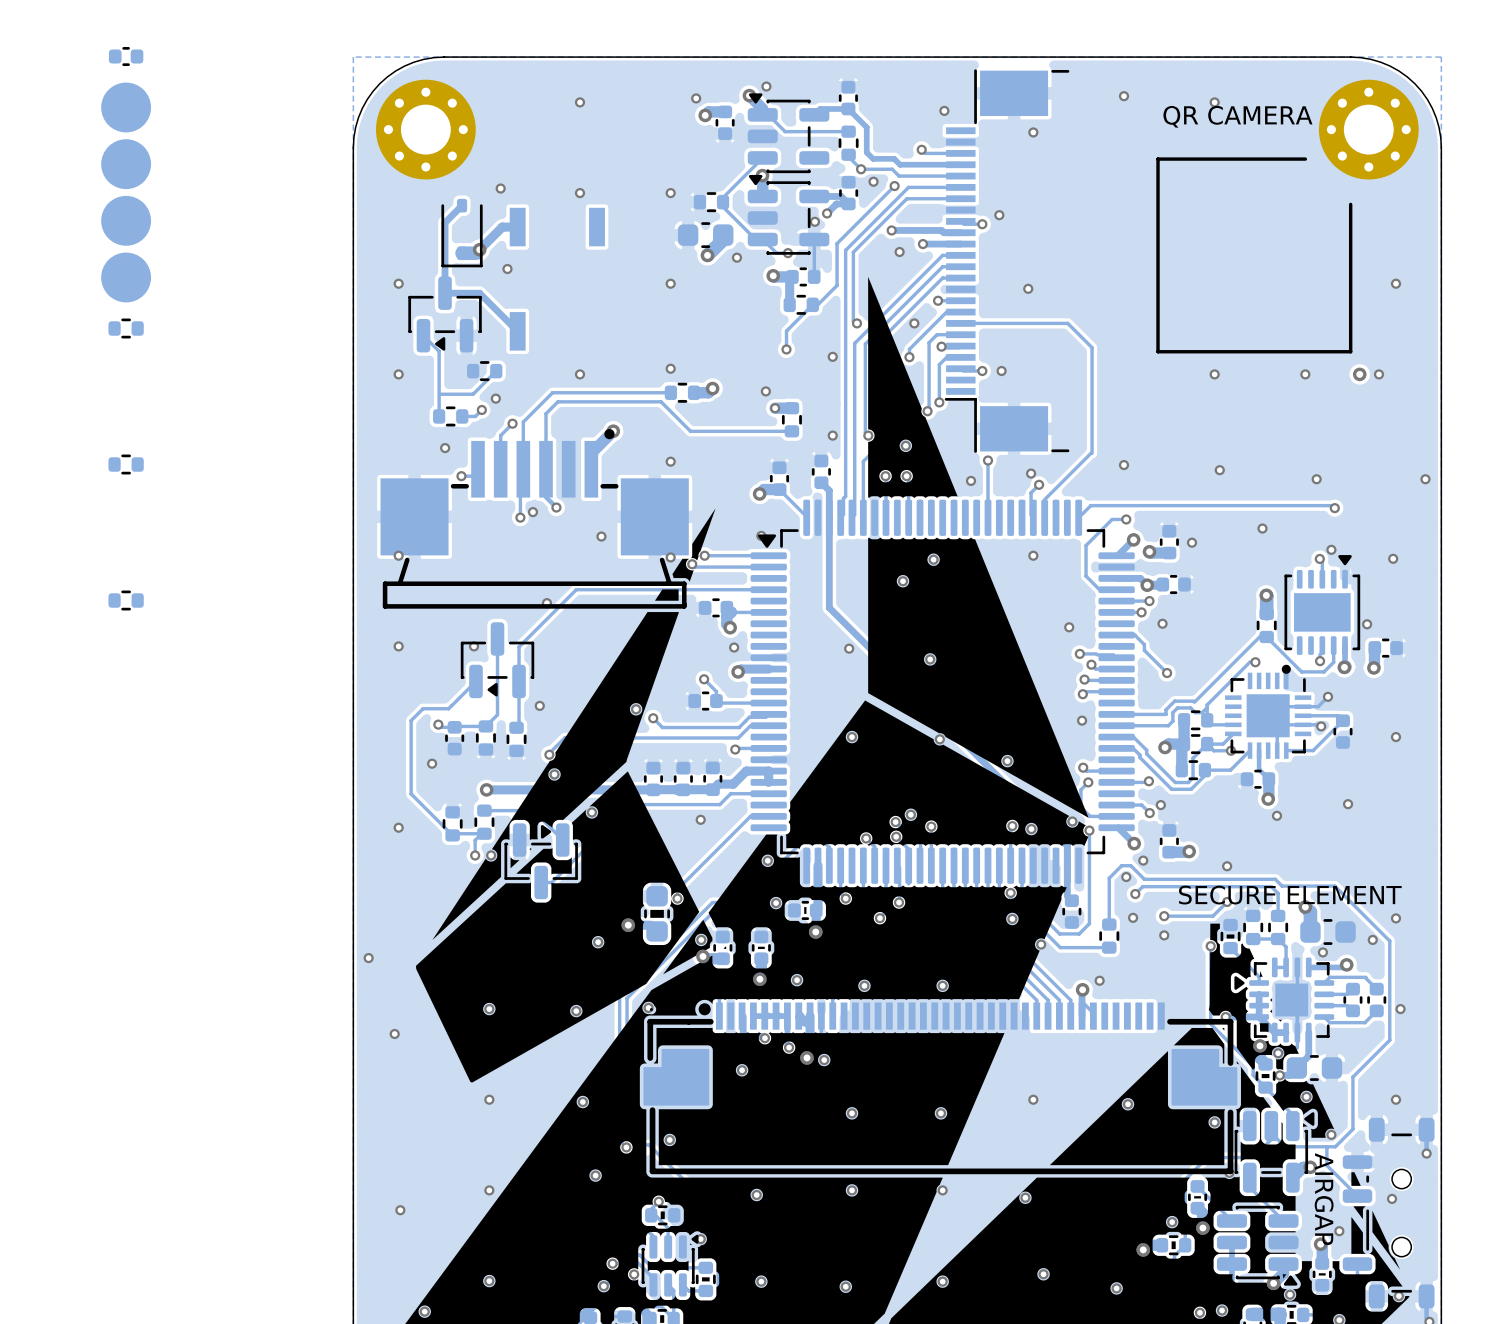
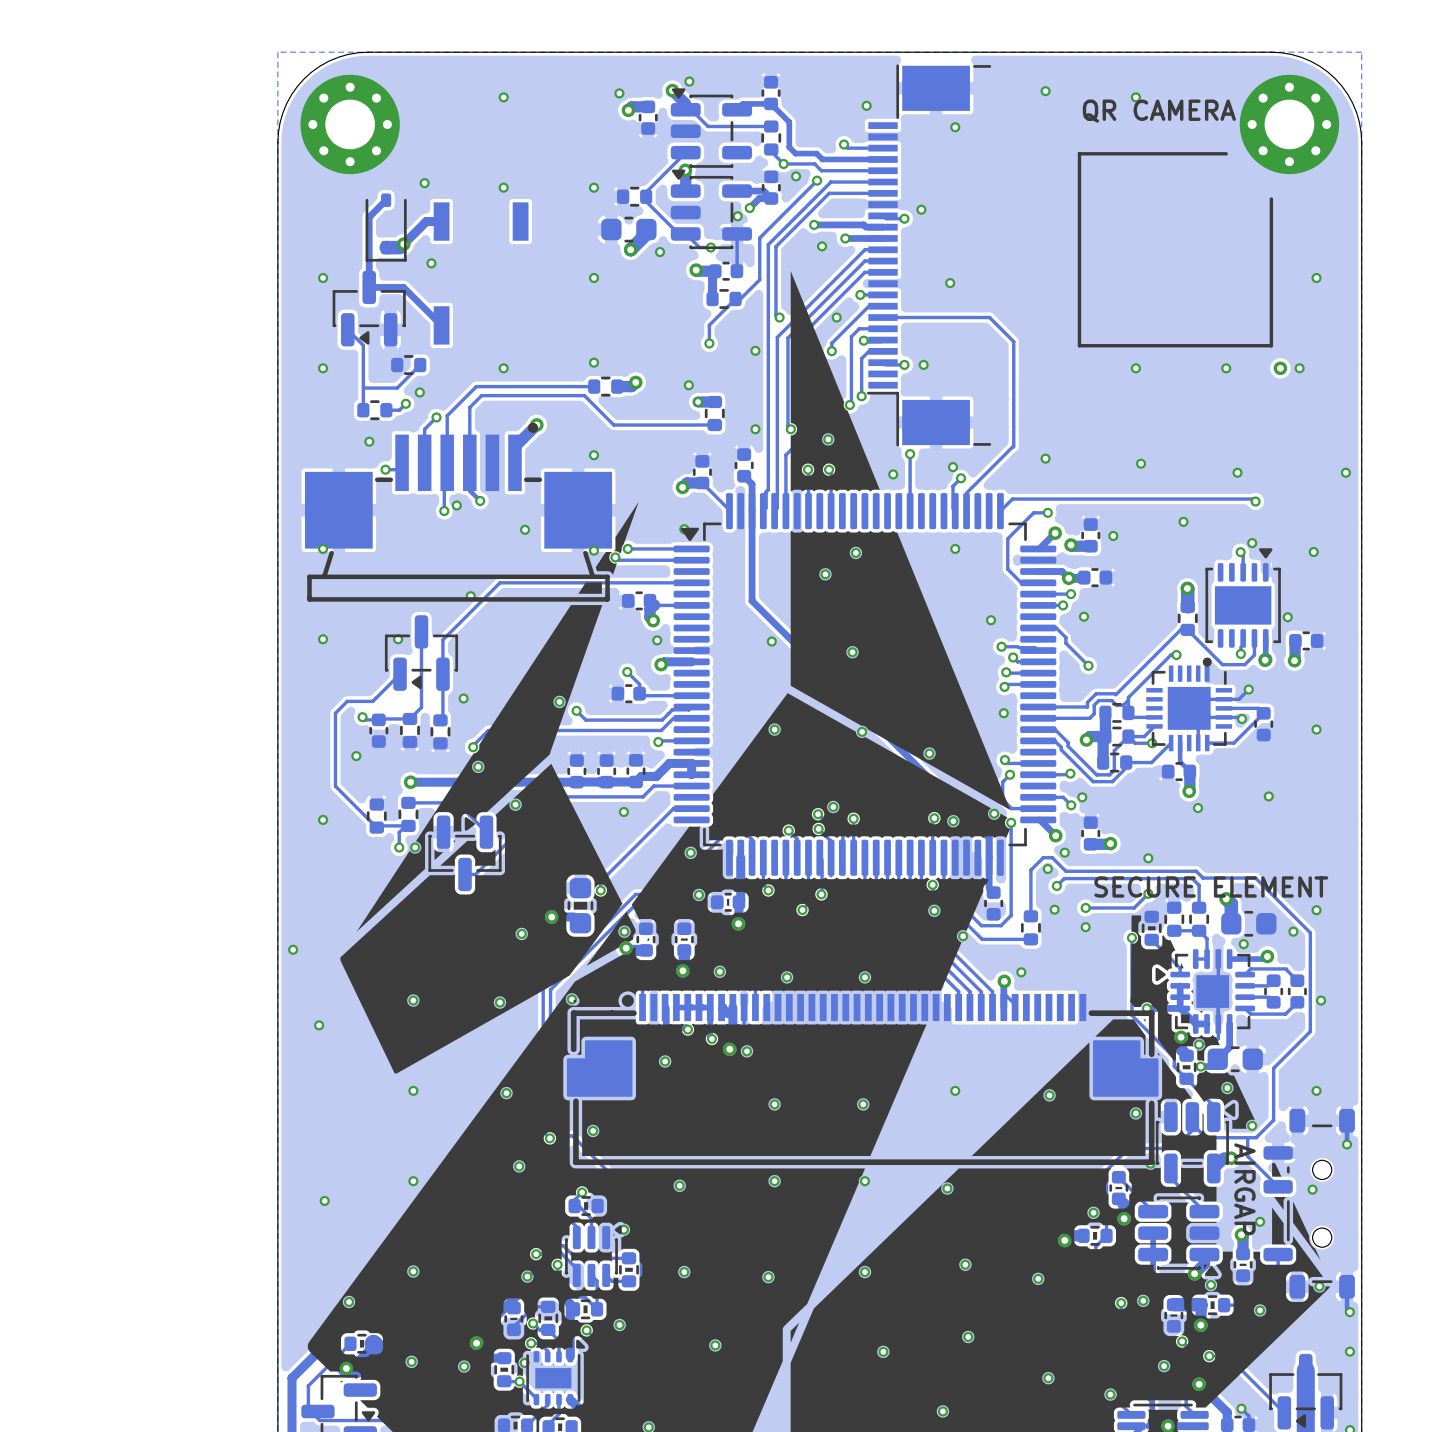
part: (126, 56) -> none
part: (126, 192) -> none
part: (126, 328) -> none
part: (126, 464) -> none
part: (126, 600) -> none

